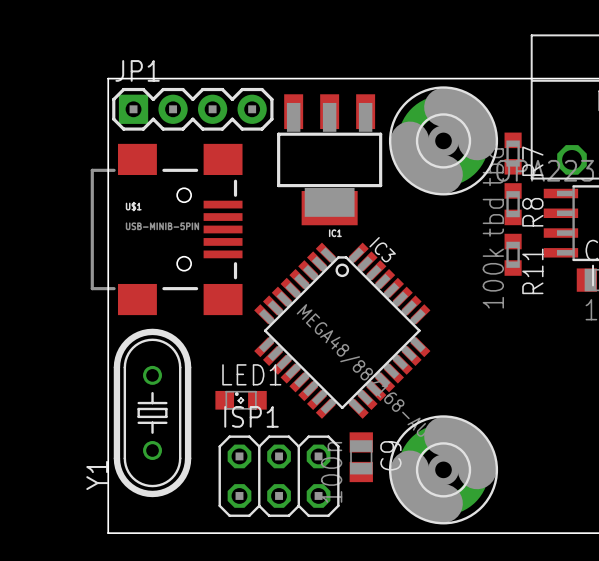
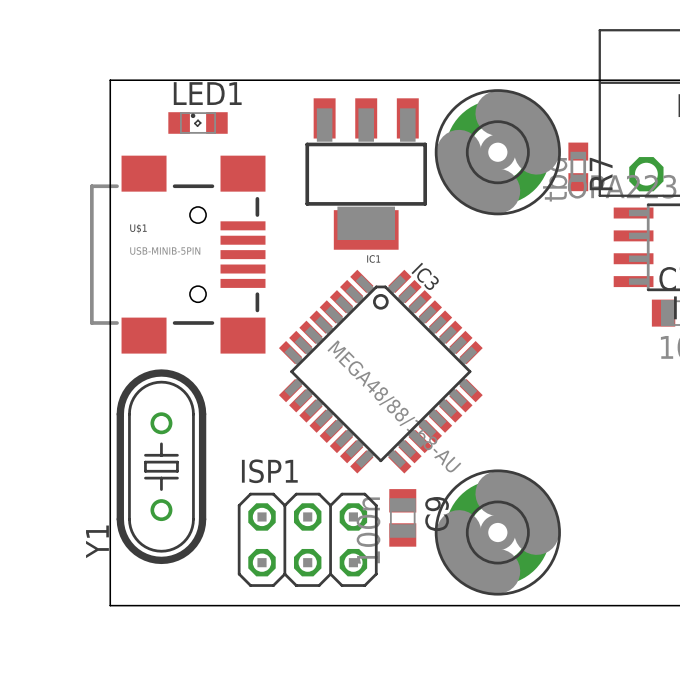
JP1: (192, 109) -> none
R8: tbd (513, 204) -> none
R11: 100k (513, 254) -> none
LED1 position: (241, 400) -> (198, 122)

